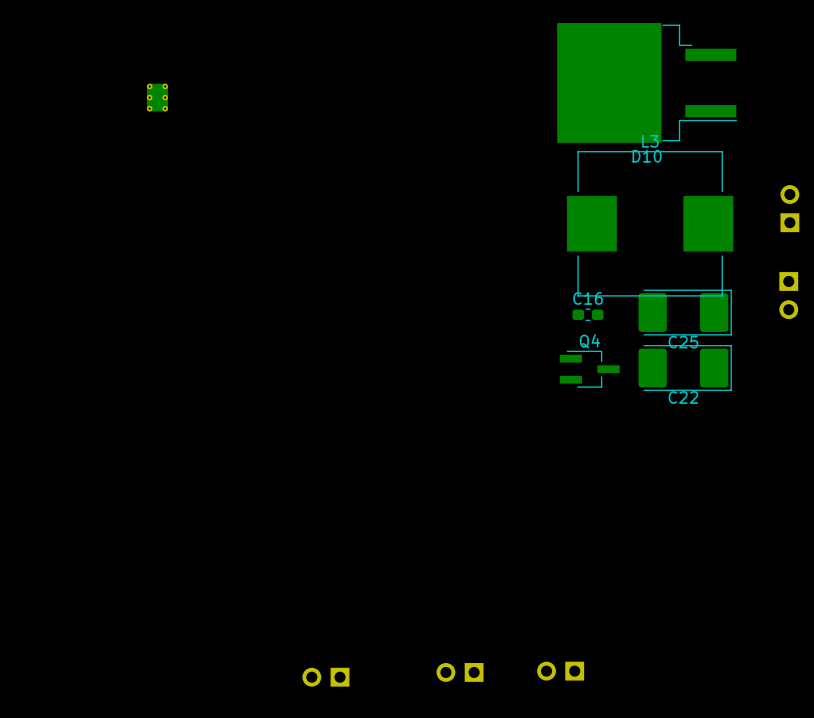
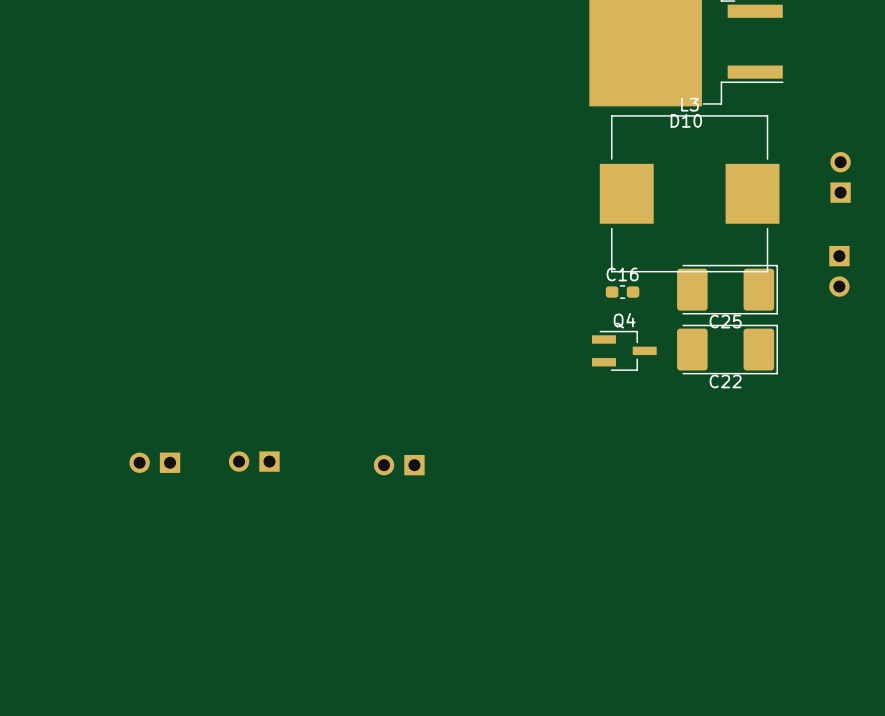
part: (157, 97) -> none
part: none -> (254, 461)
part: none -> (154, 462)
part: none -> (399, 465)
part: (560, 671) -> none
part: (460, 672) -> none
part: (325, 677) -> none

